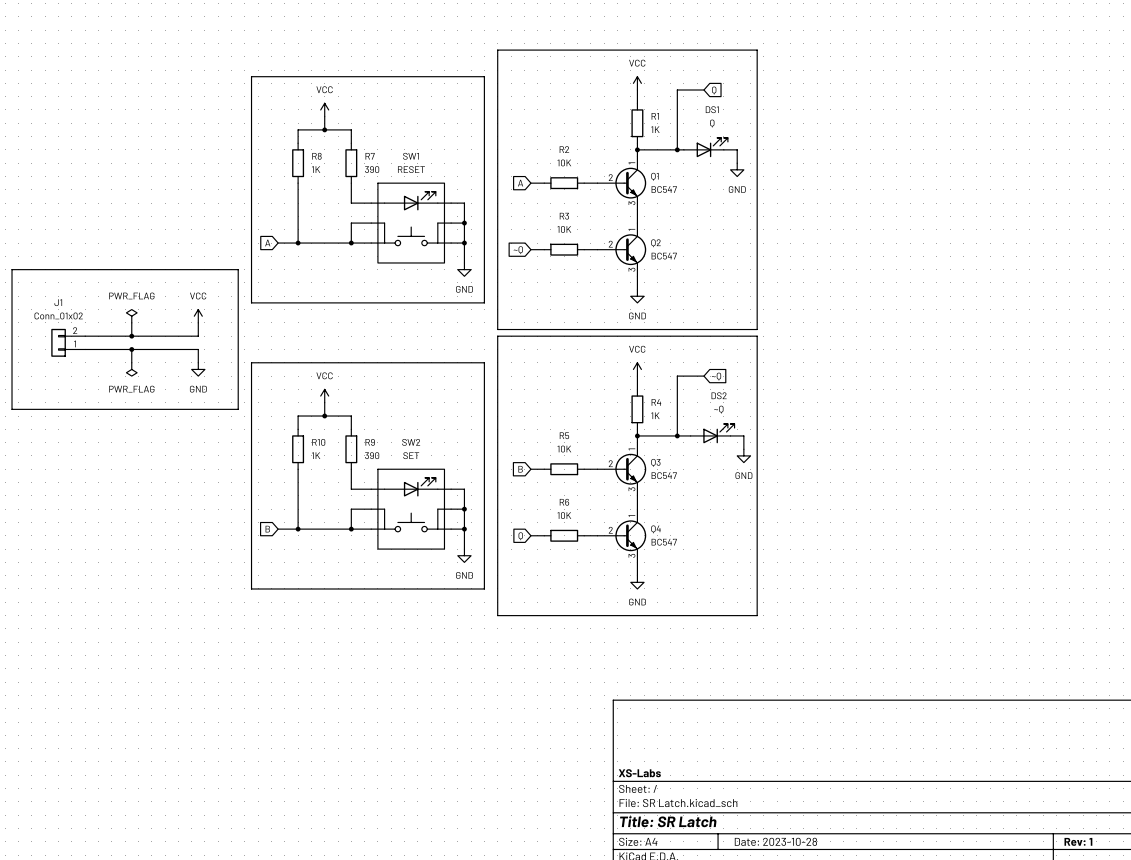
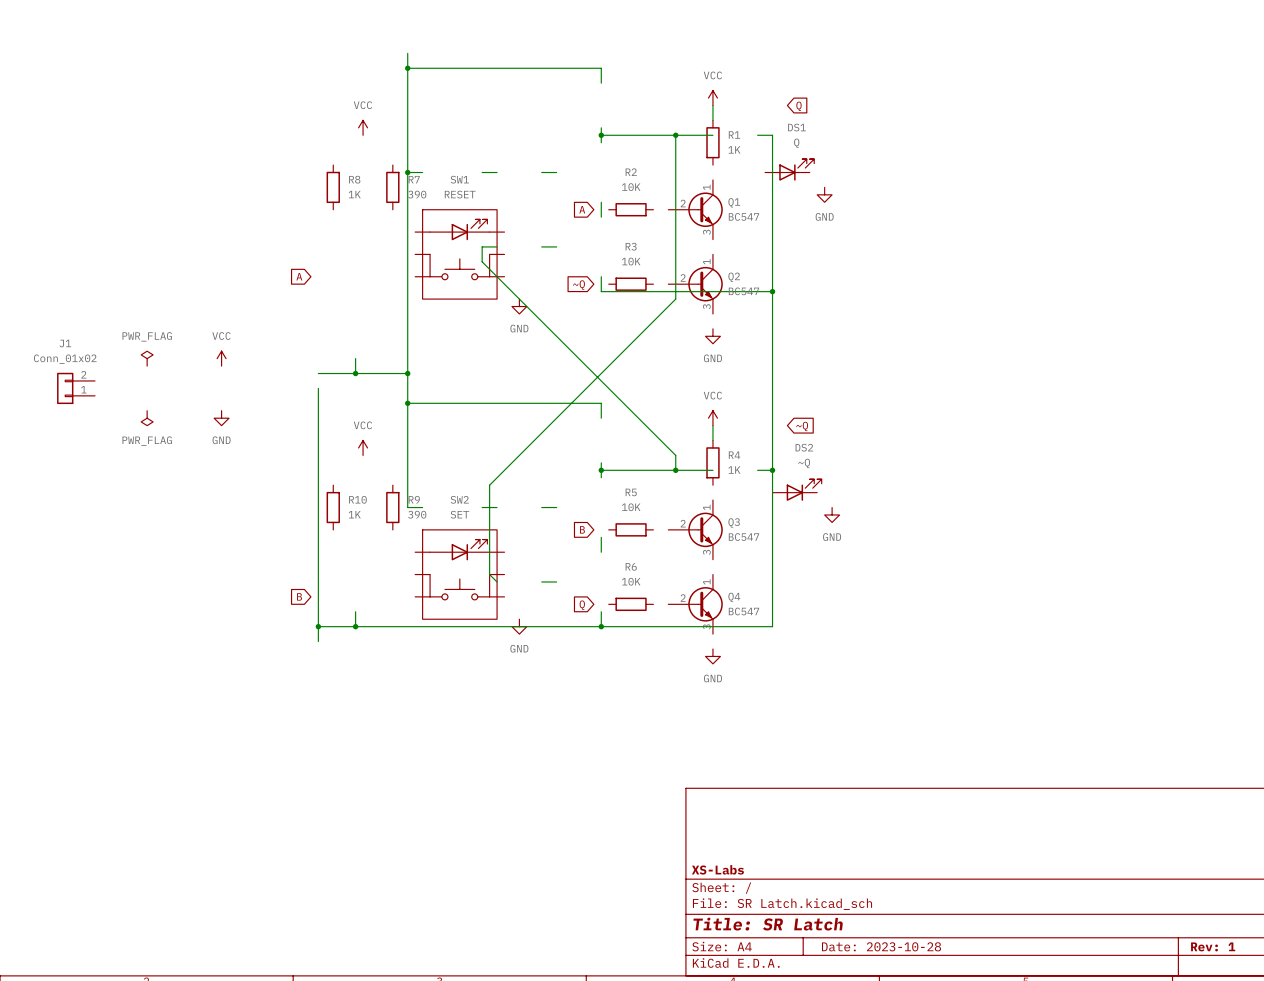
wire: none -> (407, 53) (407, 507) (422, 507)
line: (497, 50) (757, 50) (757, 329) (497, 329) (497, 50) -> none
wire: none -> (407, 68) (601, 68) (601, 83)
junction: none -> (407, 68)
line: (251, 76) (251, 302) (484, 302) (484, 76) (251, 76) -> none
wire: (703, 90) (677, 90) (677, 149) -> none
wire: (324, 116) (324, 129) -> none
wire: none -> (601, 135) (712, 135)
junction: none -> (601, 135)
wire: none -> (675, 135) (675, 299) (489, 485) (489, 574) (497, 581)
junction: none -> (675, 135)
wire: none -> (757, 135) (772, 135) (772, 626) (318, 626)
junction: (324, 129) -> none
wire: (298, 143) (298, 129) (351, 129) (351, 143) -> none
wire: (637, 143) (637, 156) -> (601, 127) (601, 142)
junction: none -> (407, 172)
wire: (637, 149) (683, 149) -> none
junction: (637, 149) -> none
junction: (677, 149) -> none
wire: (723, 149) (737, 149) (737, 163) -> none
wire: (298, 183) (298, 243) -> none
wire: (351, 183) (351, 203) (371, 203) -> none
wire: (530, 183) (544, 183) -> (482, 172) (497, 172)
wire: (584, 183) (597, 183) -> (541, 172) (556, 172)
wire: (451, 203) (464, 203) (464, 262) -> none
wire: (637, 209) (637, 223) -> (601, 202) (601, 217)
wire: none -> (497, 246) (482, 246) (482, 261) (675, 455) (675, 470)
wire: (371, 223) (351, 223) (351, 243) -> none
wire: (451, 223) (464, 223) -> (407, 172) (422, 172)
junction: (464, 223) -> none
wire: (278, 243) (371, 243) -> none
junction: (298, 243) -> none
junction: (351, 243) -> none
wire: (451, 243) (464, 243) -> none
junction: (464, 243) -> none
wire: none -> (601, 276) (601, 291) (772, 291)
wire: (530, 249) (544, 249) -> none
wire: (584, 249) (597, 249) -> (541, 246) (556, 246)
junction: none -> (772, 291)
line: (12, 269) (238, 269) (238, 409) (12, 409) (12, 269) -> none
wire: (637, 276) (637, 289) -> none
wire: (131, 322) (131, 336) -> none
wire: (198, 322) (198, 336) (85, 336) -> none
wire: none -> (318, 373) (407, 373)
junction: none -> (355, 373)
junction: none -> (407, 373)
junction: (131, 336) -> none
line: (497, 336) (497, 615) (757, 615) (757, 336) (497, 336) -> none
wire: none -> (318, 388) (318, 641)
wire: (85, 349) (198, 349) (198, 362) -> none
wire: (131, 349) (131, 362) -> none
junction: (131, 349) -> none
wire: none -> (407, 403) (601, 403) (601, 418)
junction: none -> (407, 403)
line: (251, 362) (484, 362) (484, 588) (251, 588) (251, 362) -> none
wire: (703, 376) (677, 376) (677, 435) -> none
wire: (324, 402) (324, 416) -> (355, 358) (355, 373)
junction: (324, 416) -> none
wire: none -> (601, 470) (712, 470)
junction: none -> (601, 470)
junction: none -> (675, 470)
wire: none -> (757, 470) (772, 470)
wire: (298, 429) (298, 416) (351, 416) (351, 429) -> none
wire: (637, 429) (637, 442) -> (601, 462) (601, 477)
wire: (637, 435) (690, 435) -> none
junction: (637, 435) -> none
junction position: (677, 435) -> (772, 470)
wire: (730, 435) (743, 435) (743, 449) -> none
wire: (298, 469) (298, 529) -> none
wire: (351, 469) (351, 489) (371, 489) -> none
wire: (530, 469) (544, 469) -> (482, 507) (497, 507)
wire: (584, 469) (597, 469) -> (541, 507) (556, 507)
wire: (451, 489) (464, 489) (464, 549) -> none
wire: (637, 495) (637, 509) -> (601, 537) (601, 552)
wire: (371, 509) (351, 509) (351, 529) -> none
wire: (451, 509) (464, 509) -> none
junction: (464, 509) -> none
wire: (278, 529) (371, 529) -> none
junction: (298, 529) -> none
junction: (351, 529) -> none
wire: (451, 529) (464, 529) -> none
junction: (464, 529) -> none
wire: (530, 535) (544, 535) -> none
wire: (584, 535) (597, 535) -> (541, 581) (556, 581)
wire: none -> (355, 611) (355, 626)
junction: none -> (318, 626)
junction: none -> (355, 626)
junction: none -> (601, 626)
wire: (637, 562) (637, 575) -> (601, 611) (601, 626)

